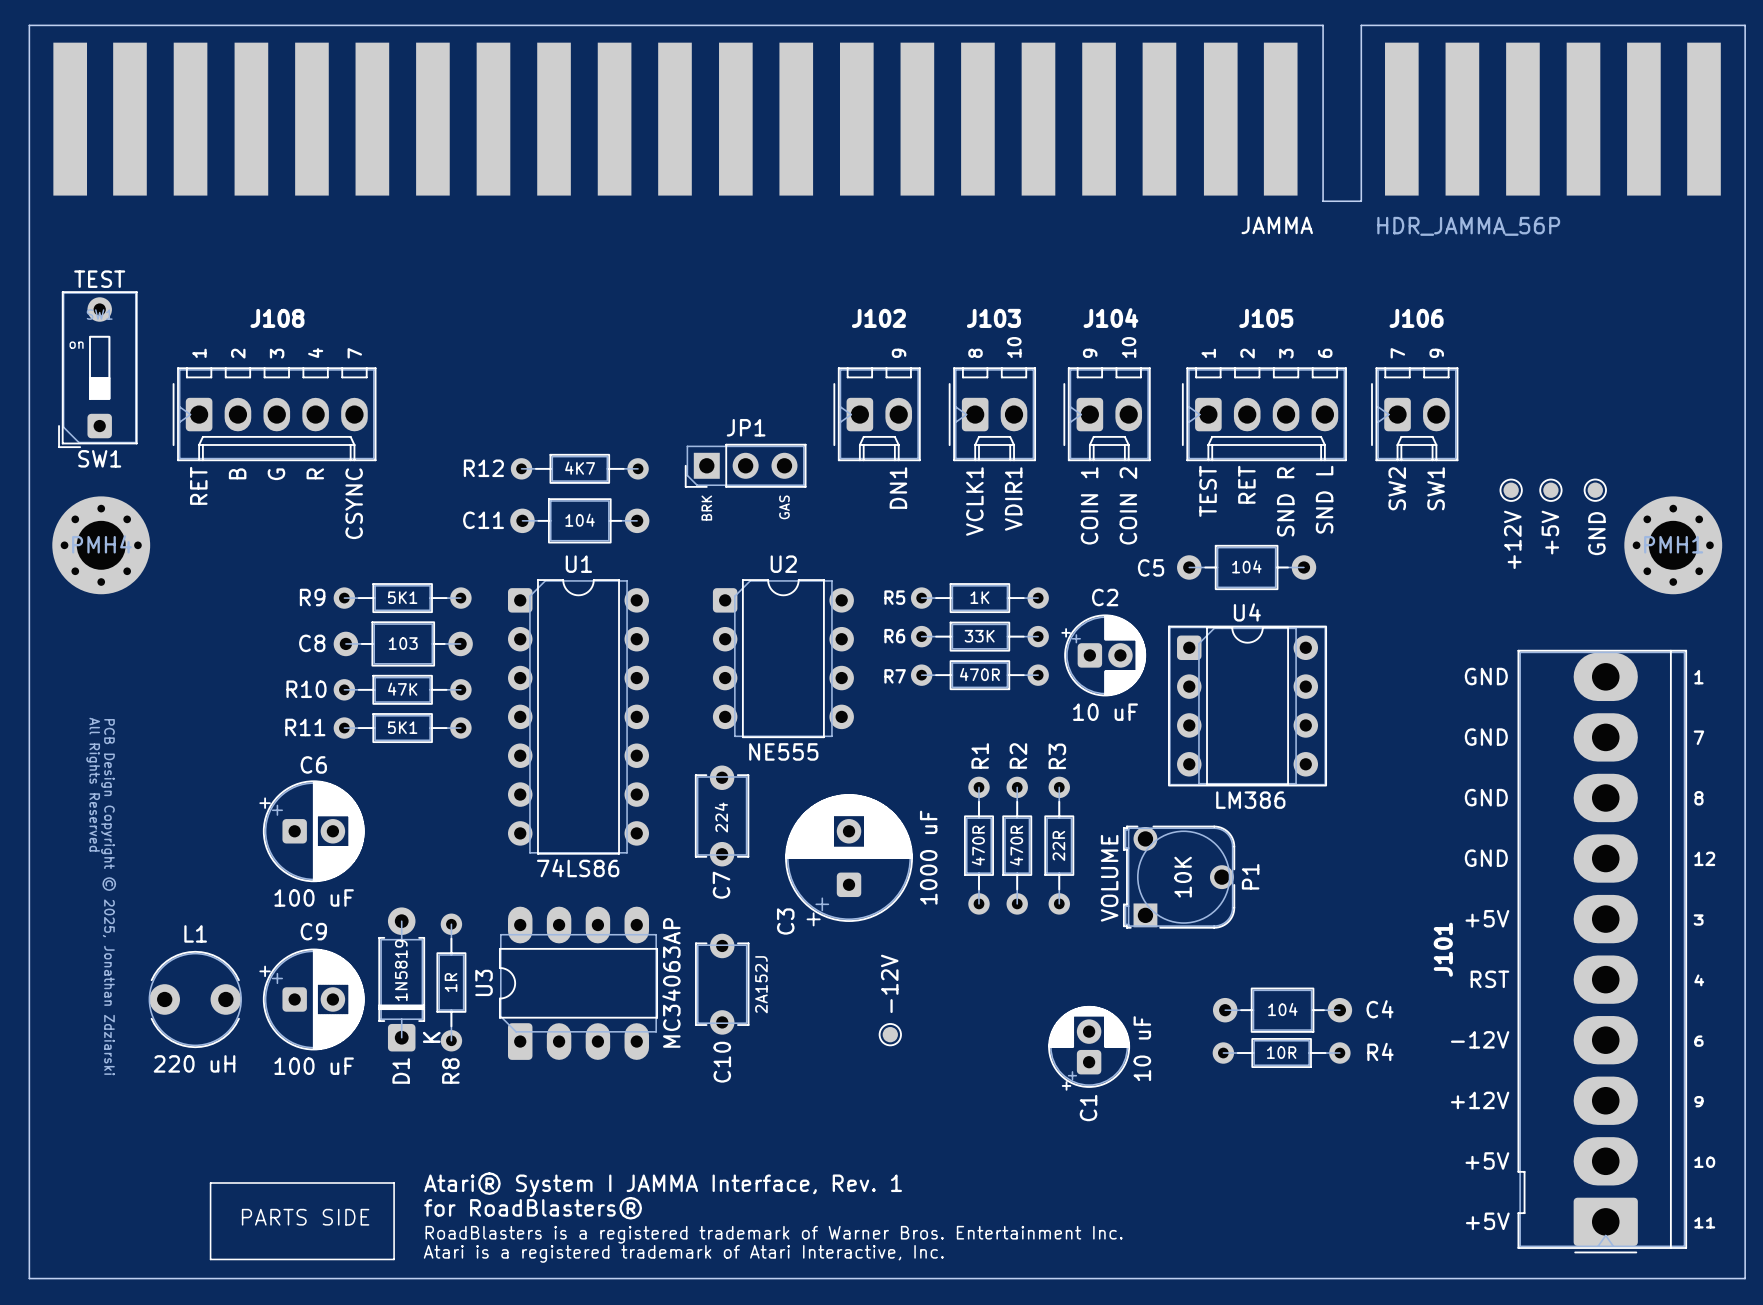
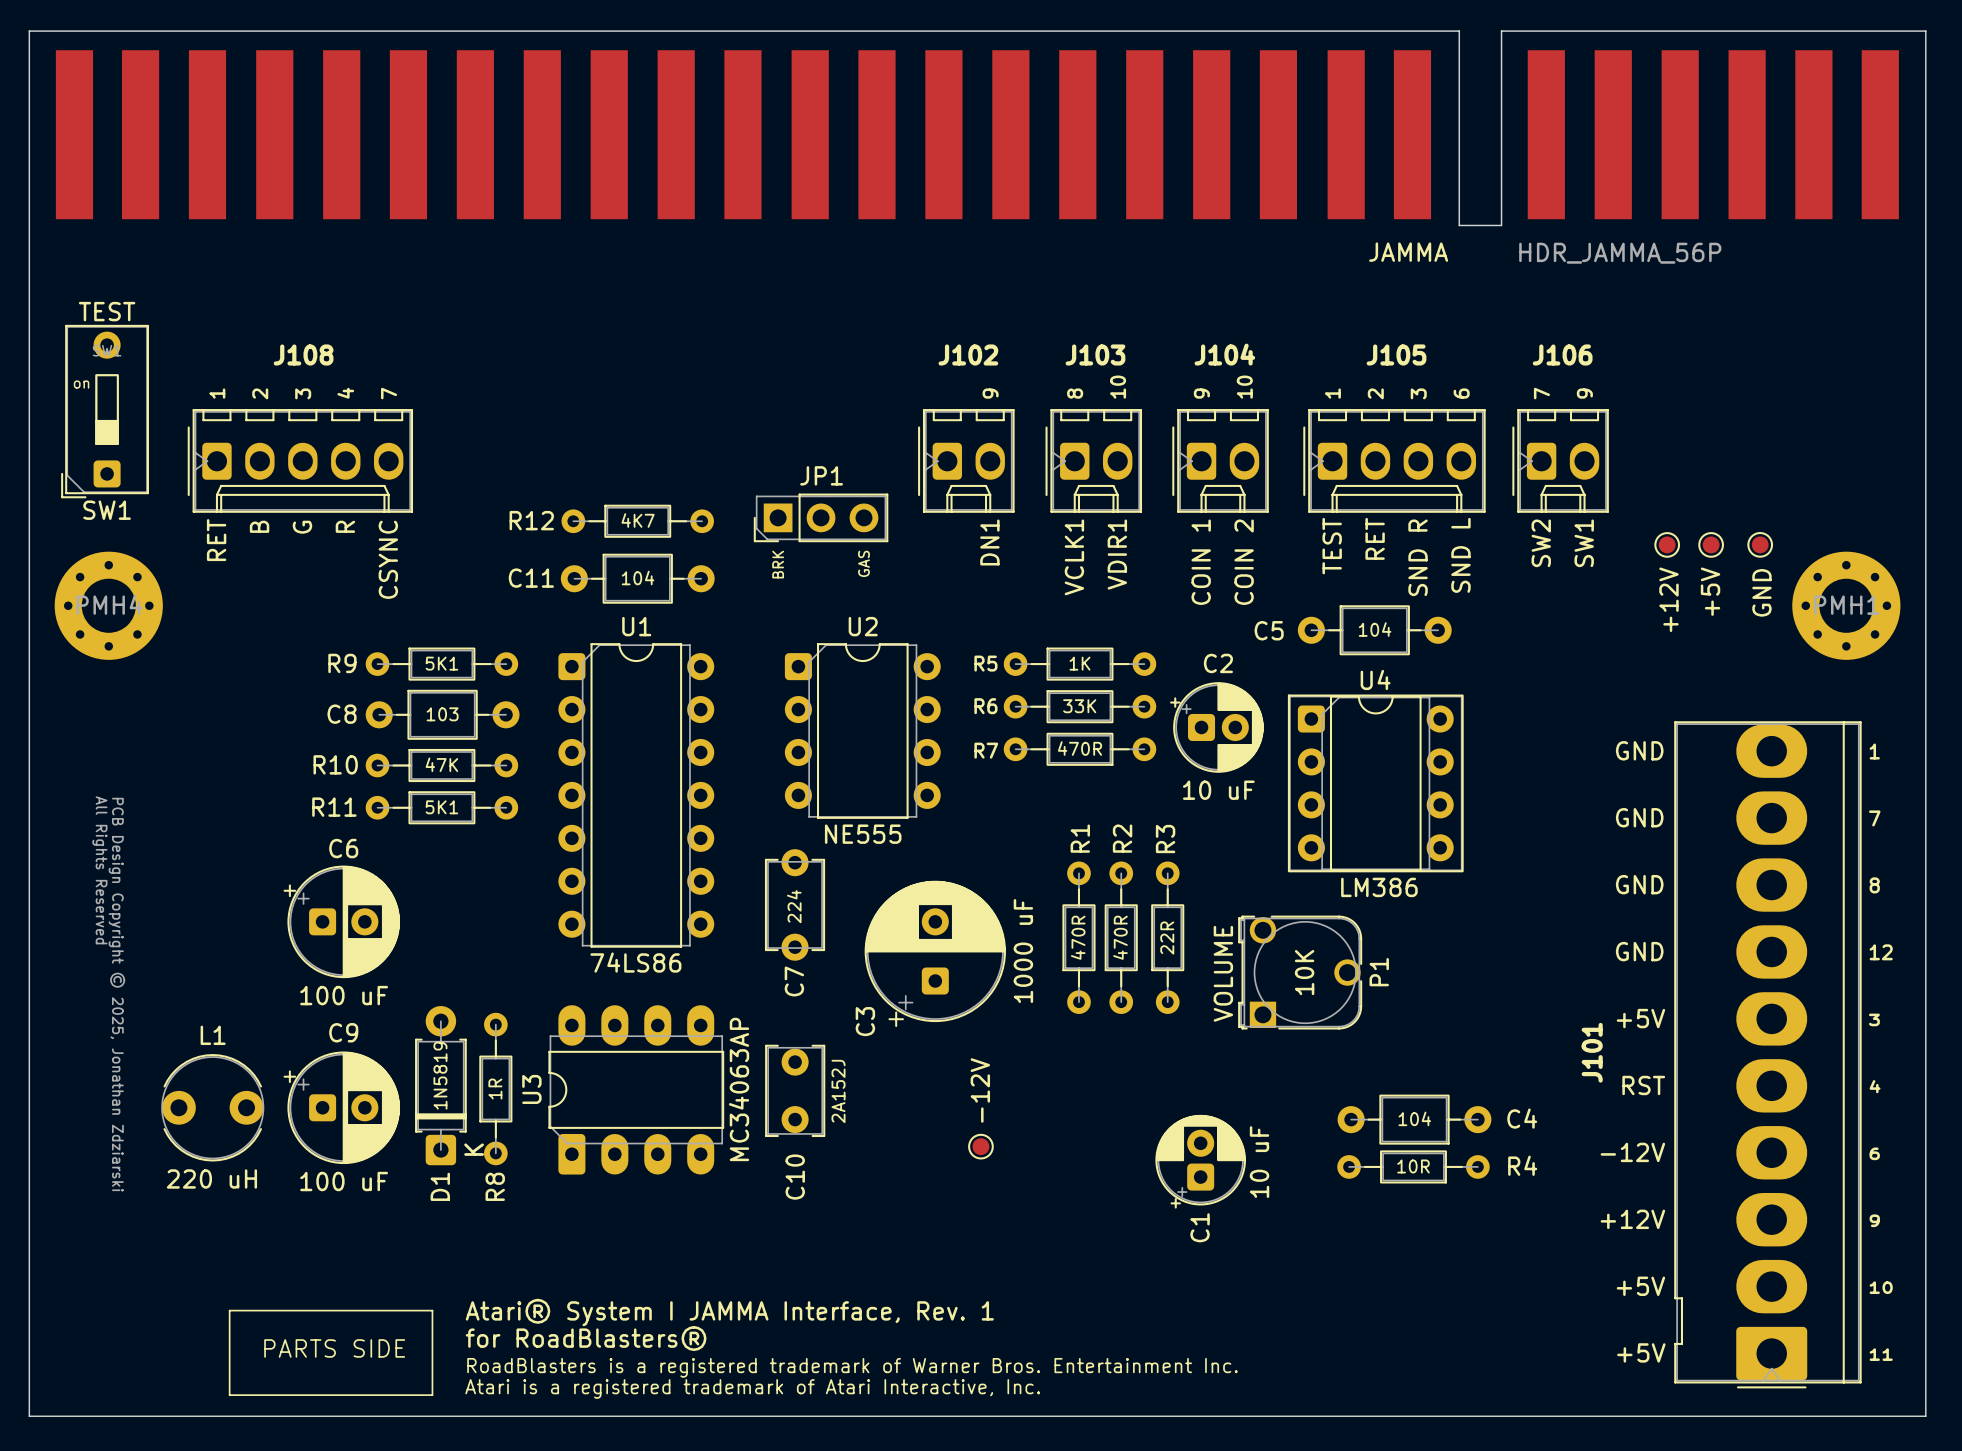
C10 footprint: [695, 933, 750, 1035] -> [765, 1044, 826, 1138]

